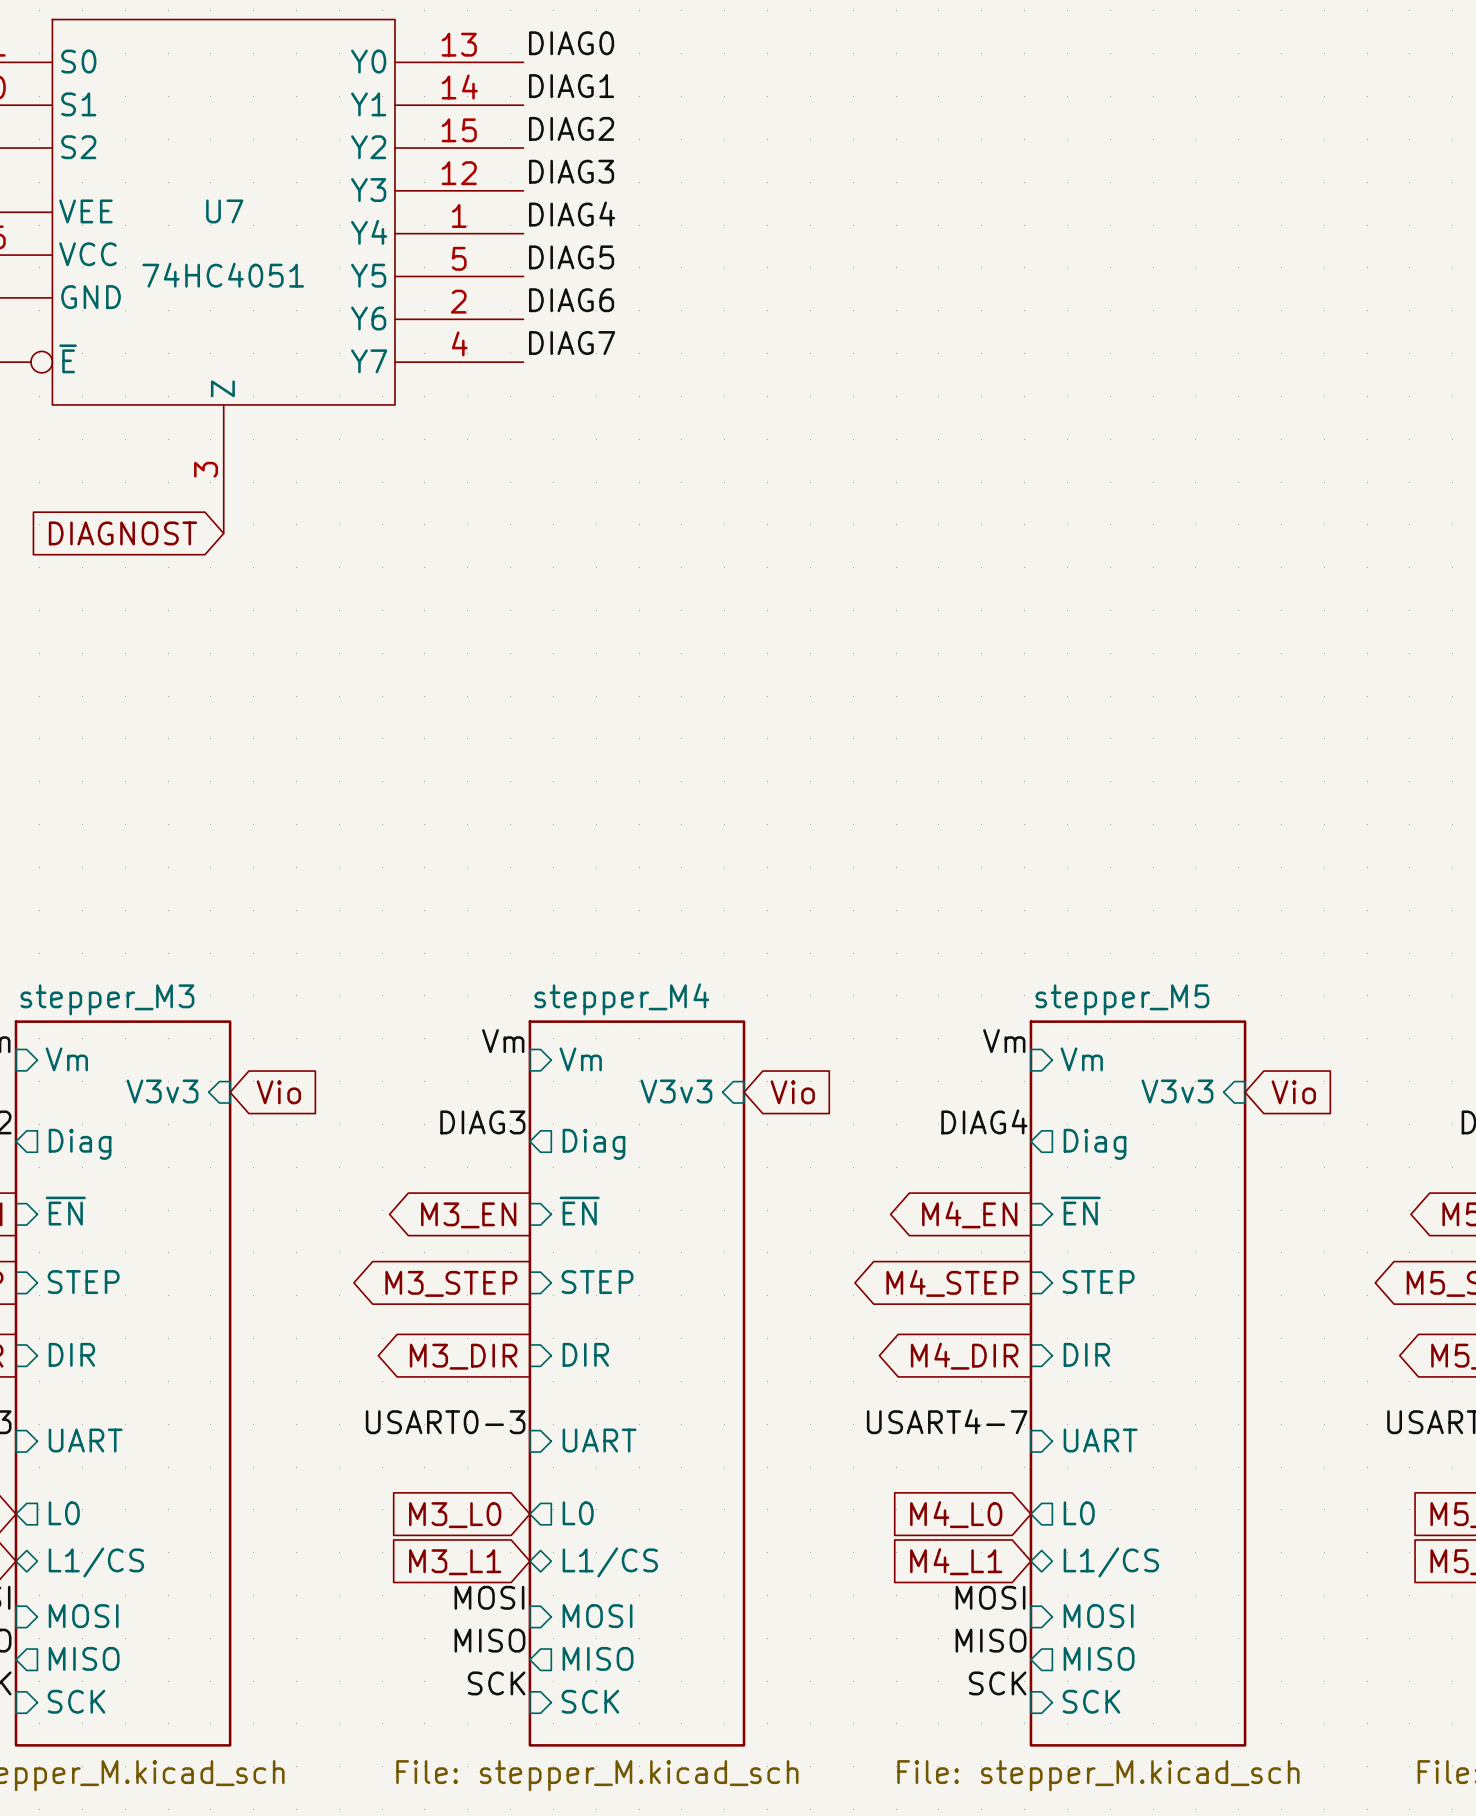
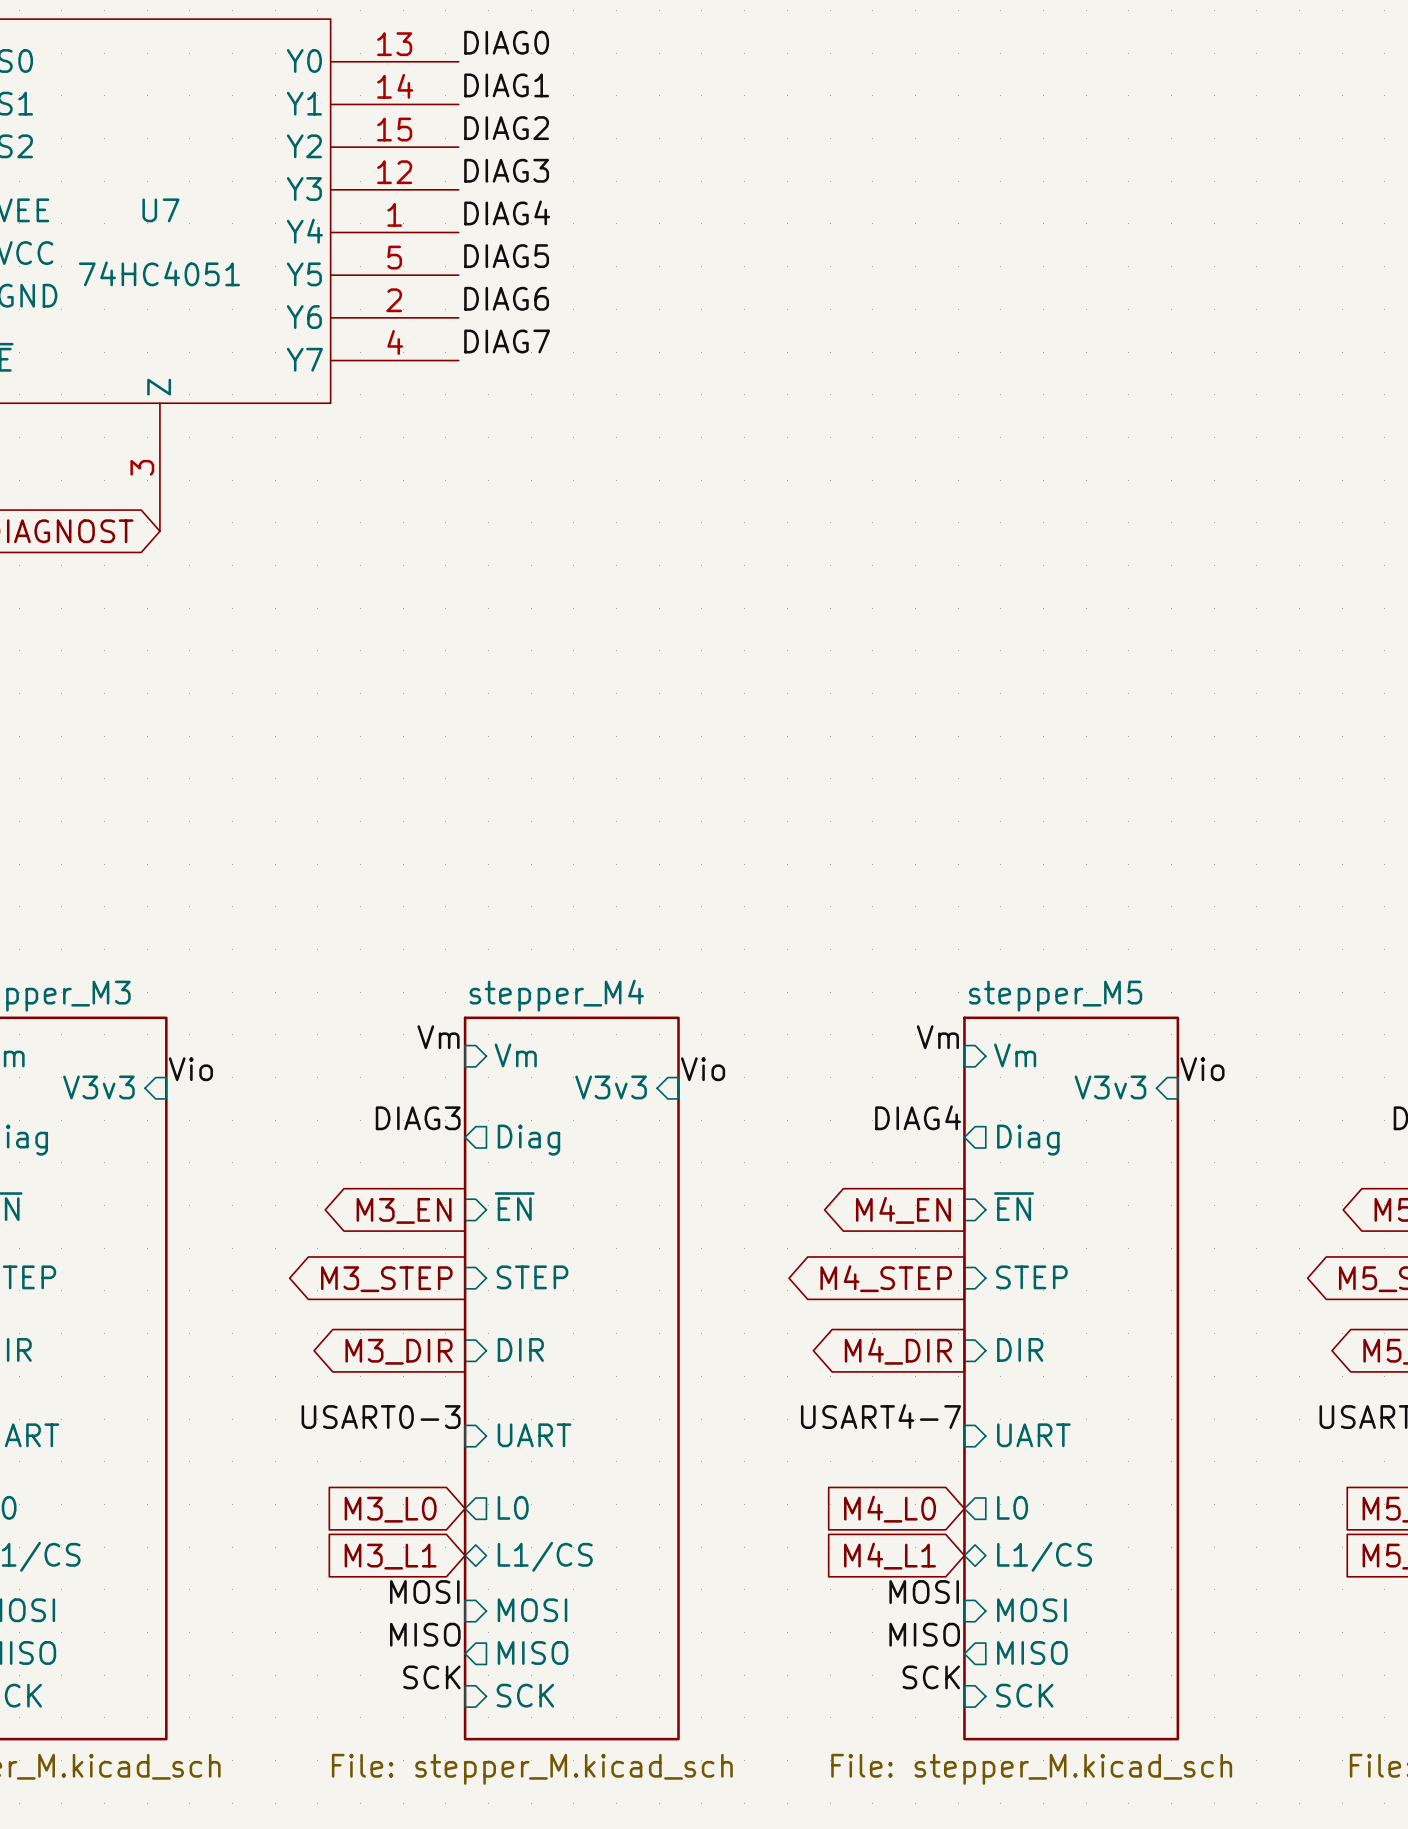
label: none -> Vio (190, 1069)
label: none -> Vio (703, 1069)
label: none -> Vio (1202, 1069)
global label: Vio (278, 1092) -> none
global label: Vio (792, 1092) -> none
global label: Vio (1293, 1092) -> none

